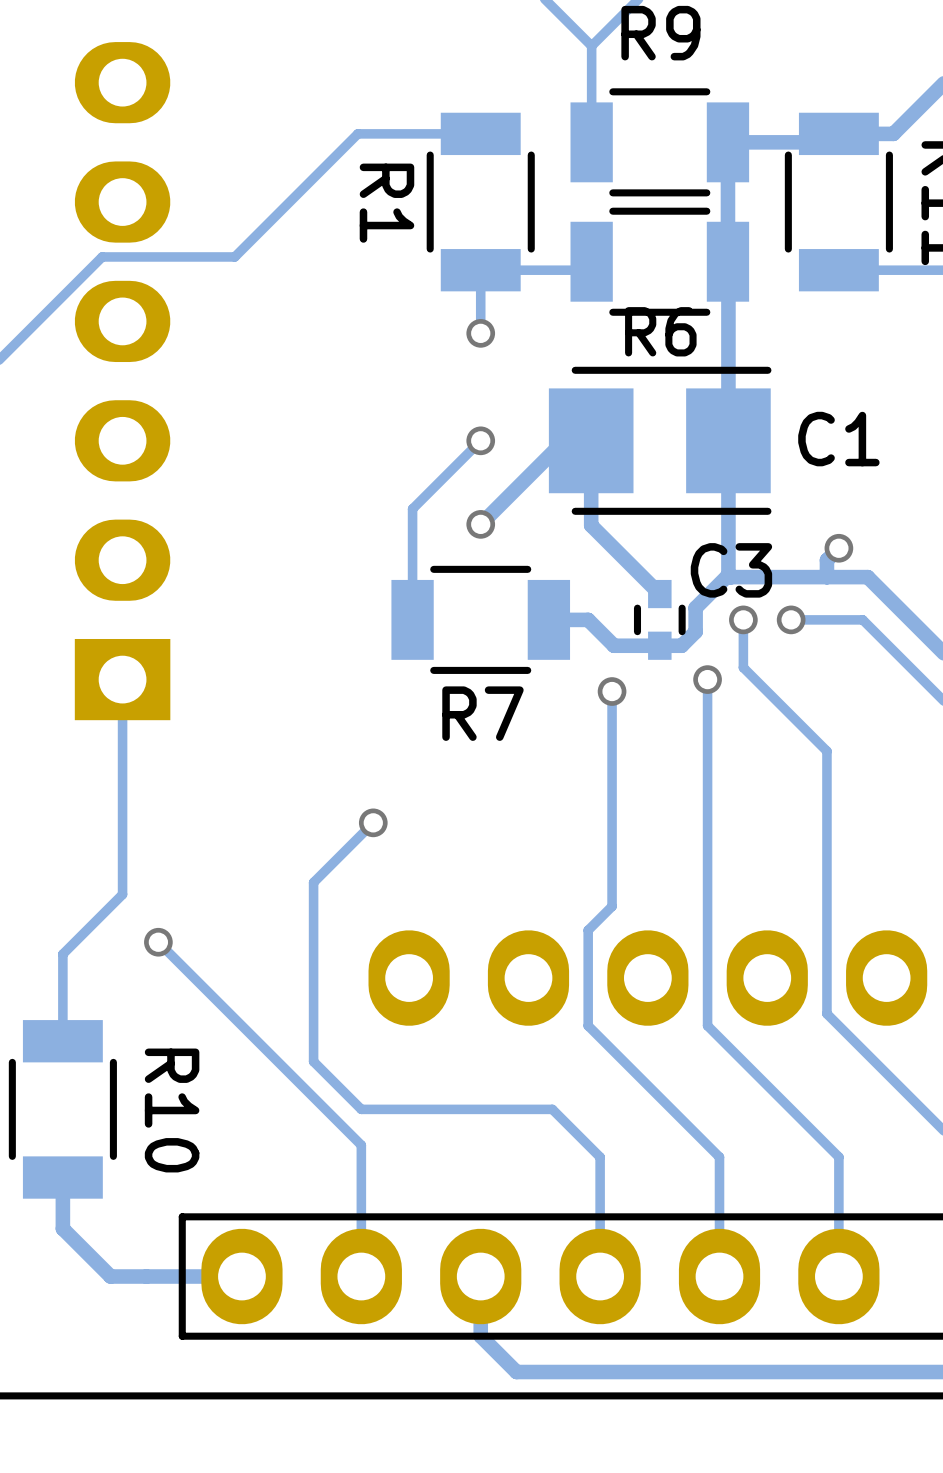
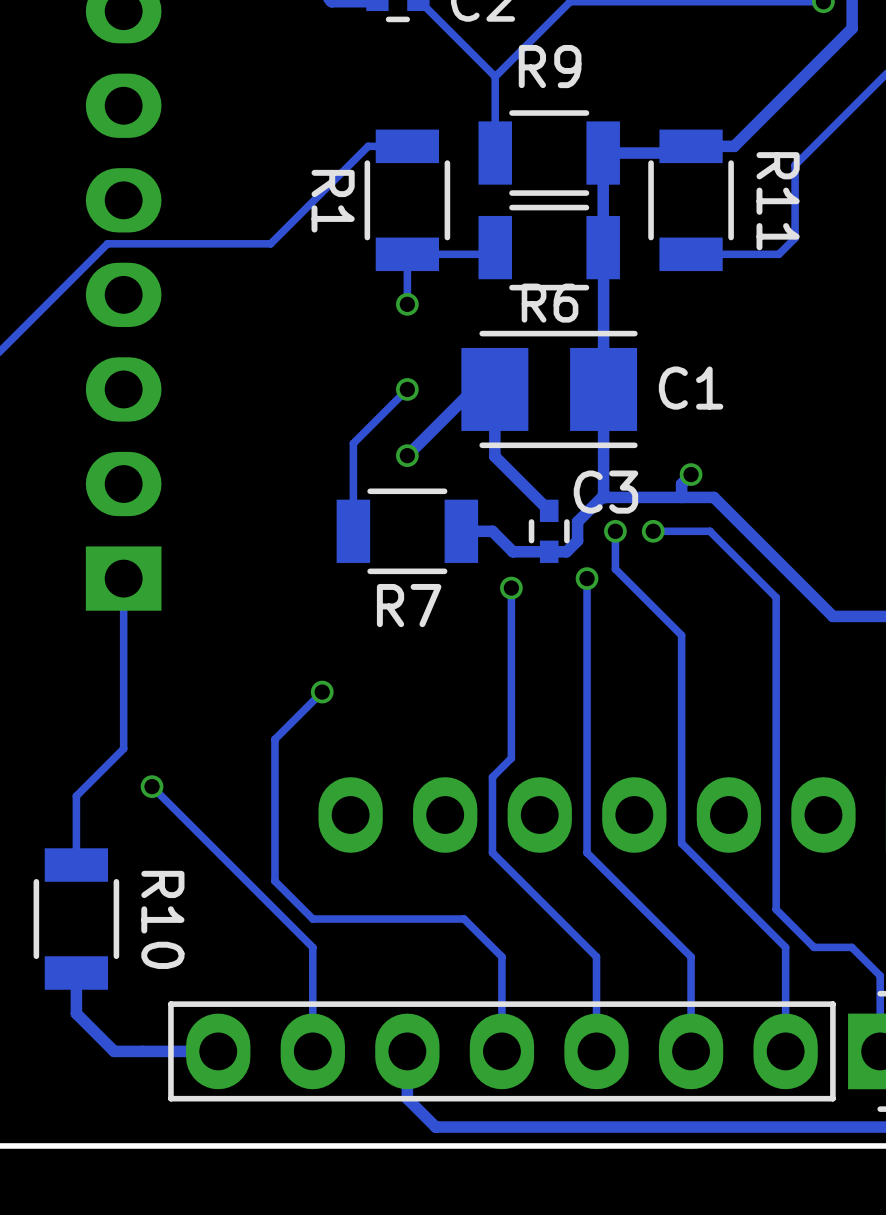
track: (431, 133) (357, 133) (234, 256) -> (368, 146) (270, 243) (212, 243)

